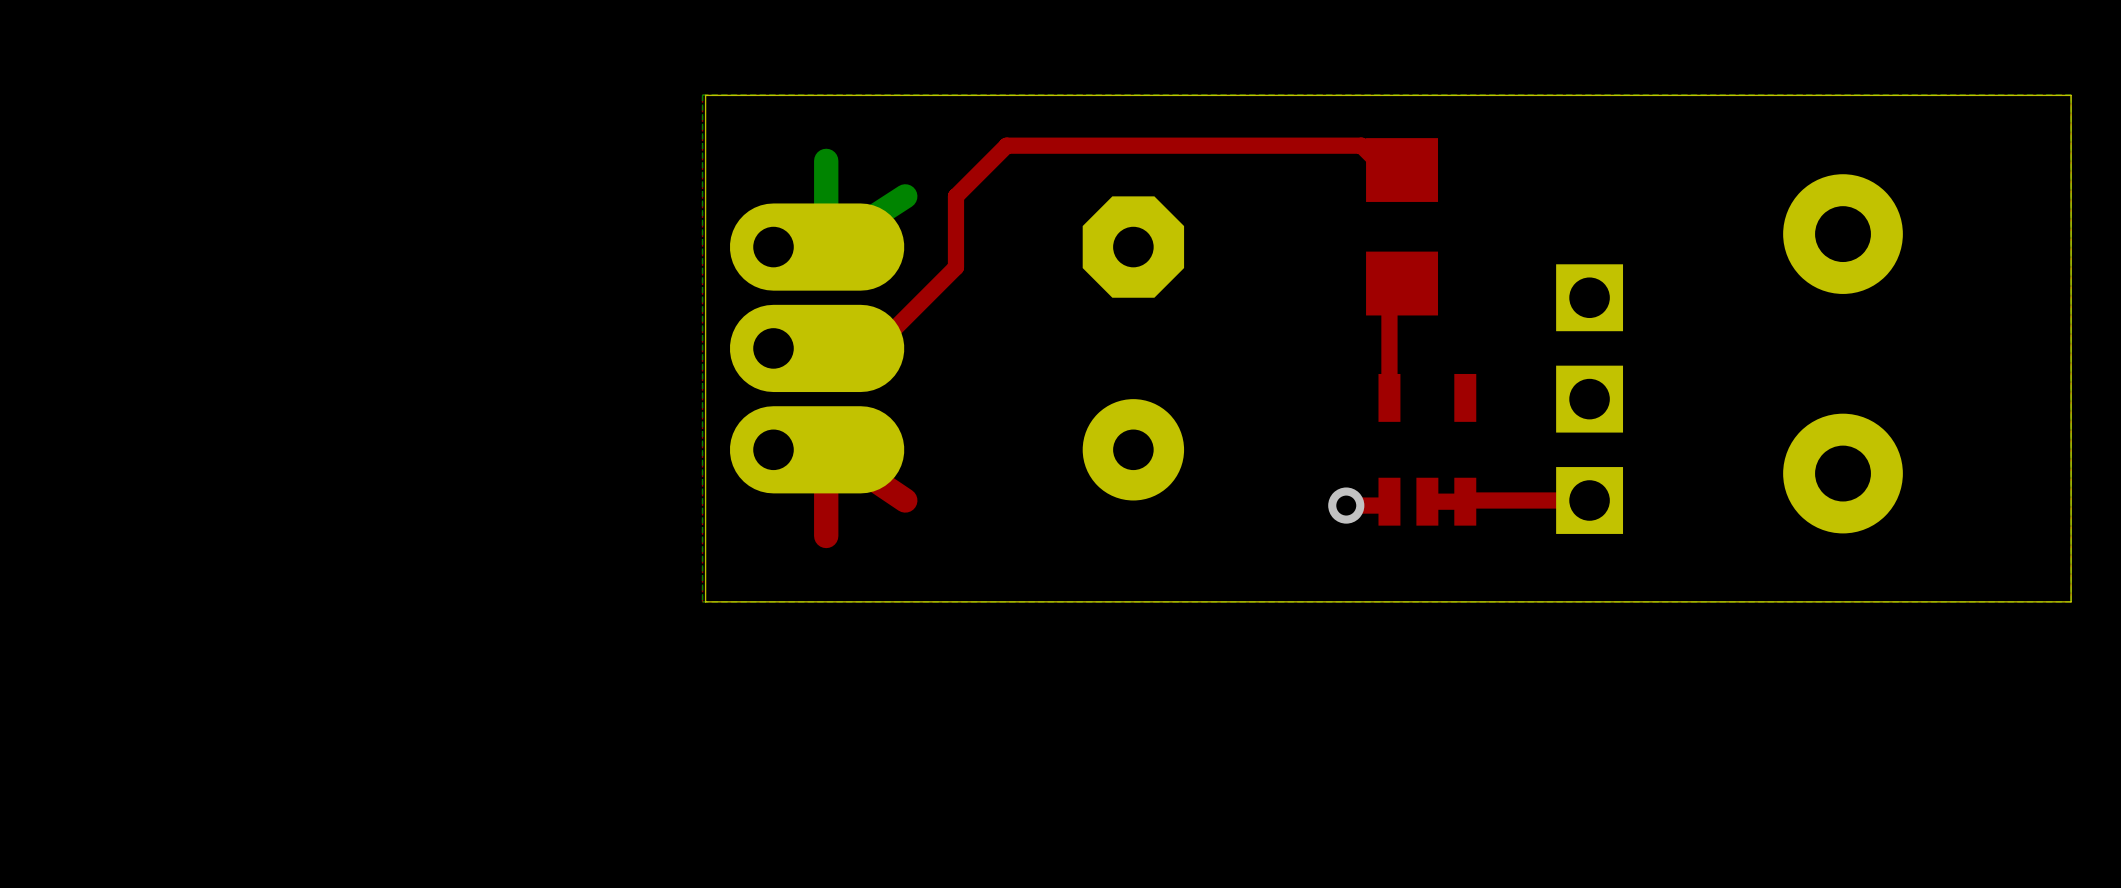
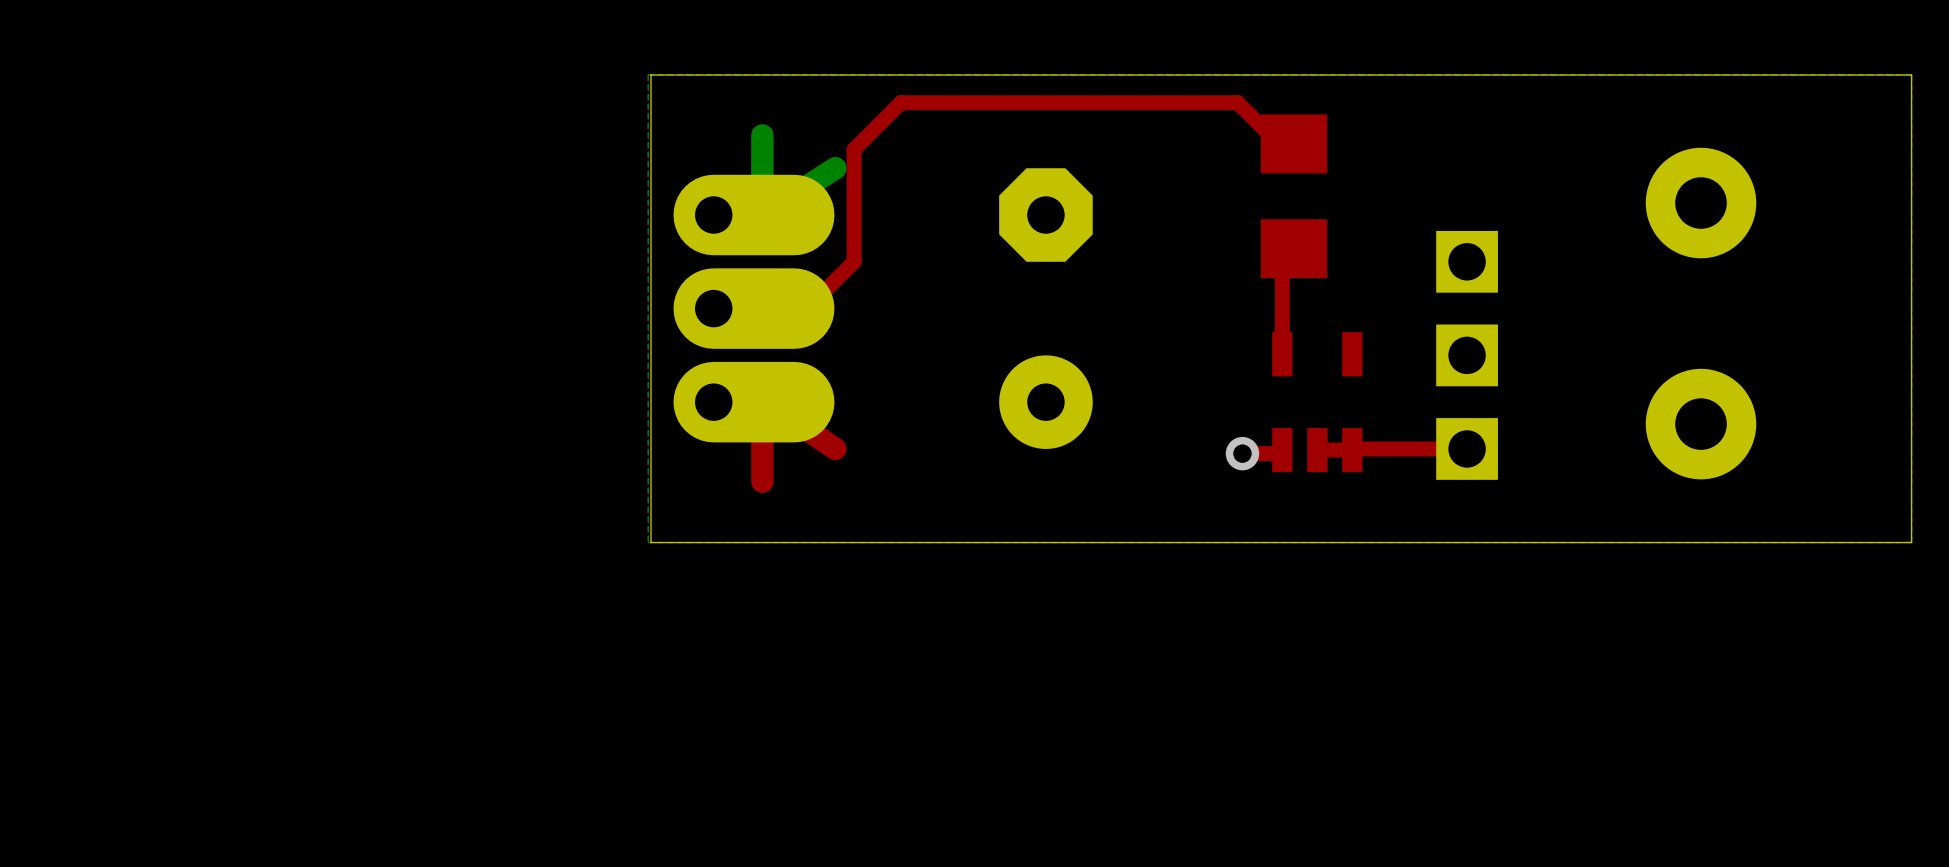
top track: (1361, 145) (1006, 145) (955, 196) (955, 267) (925, 297) -> (1256, 121) (1237, 102) (900, 102) (854, 149) (854, 261)

